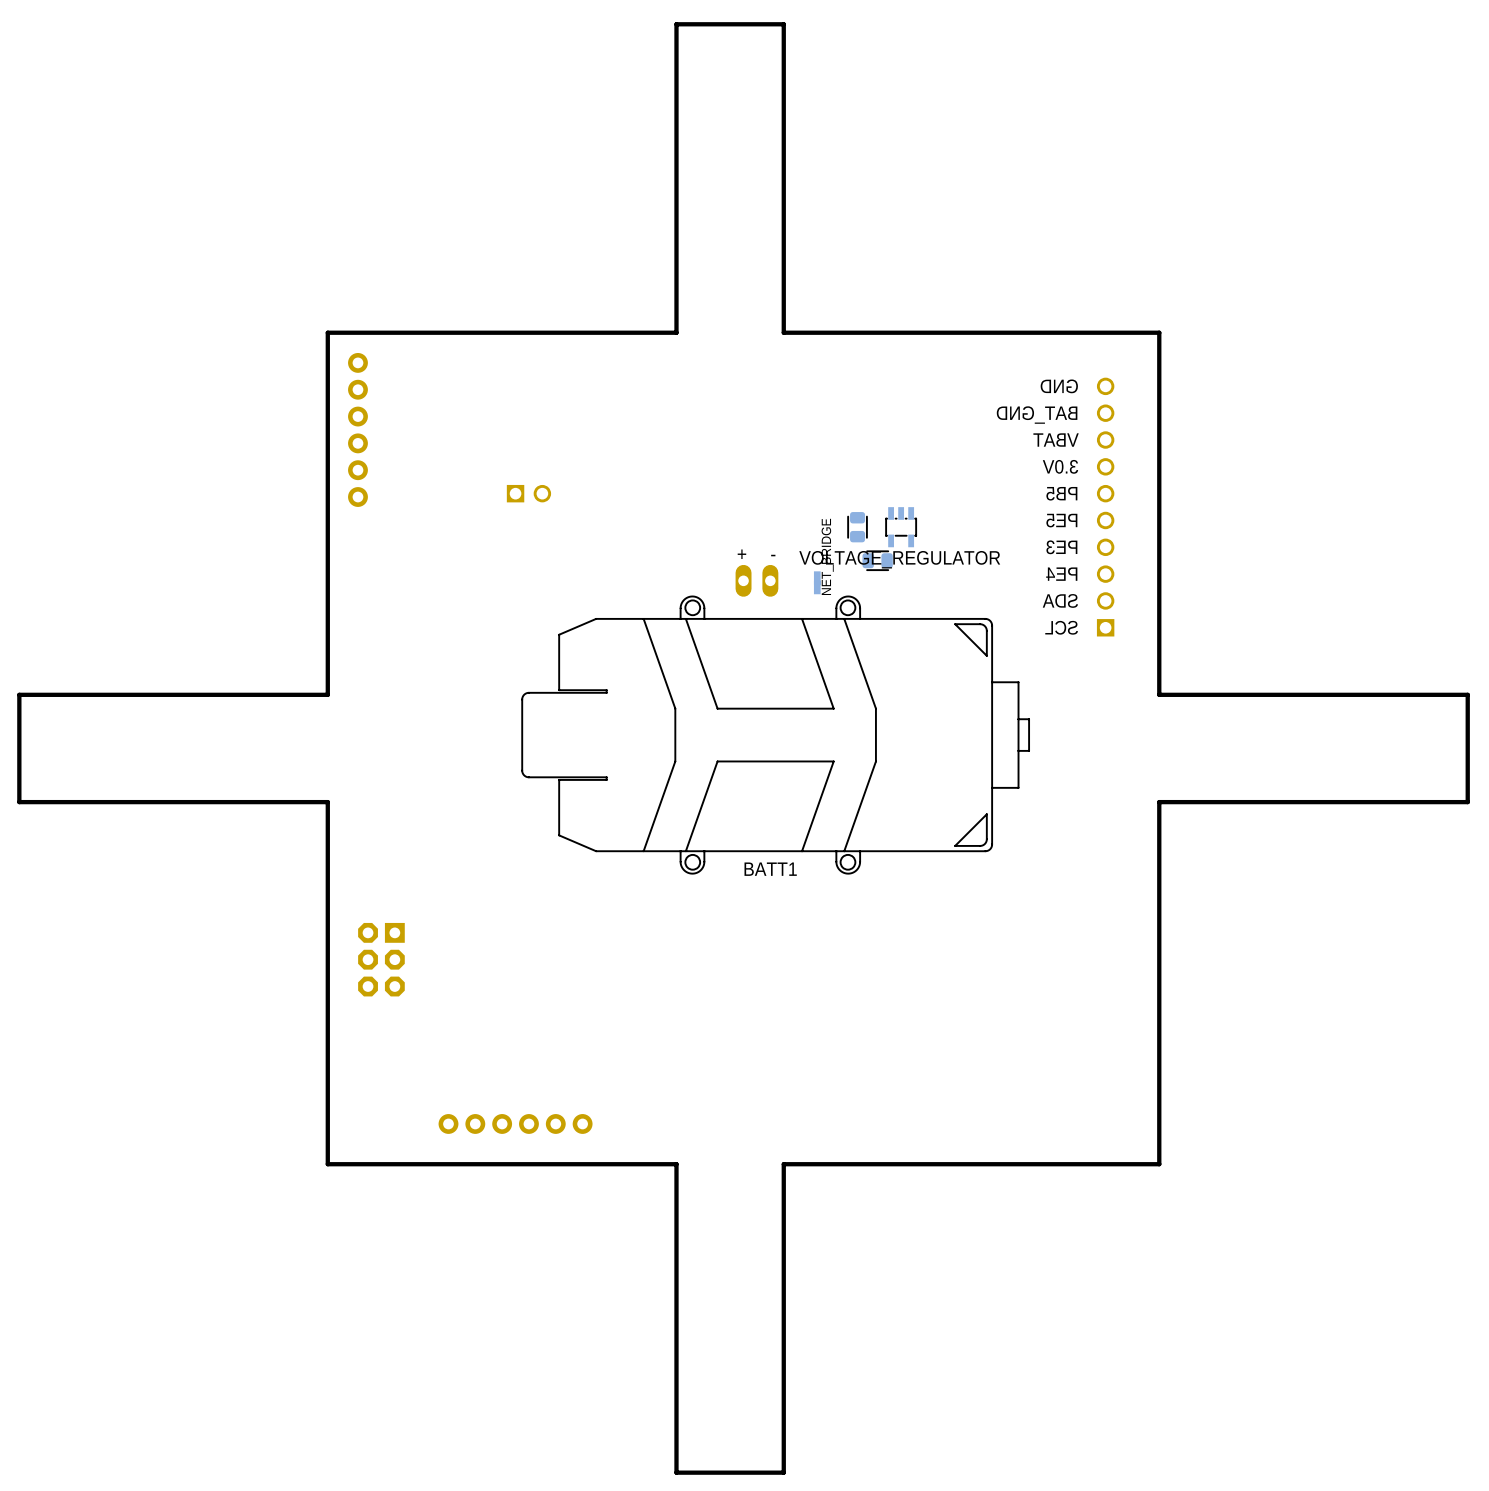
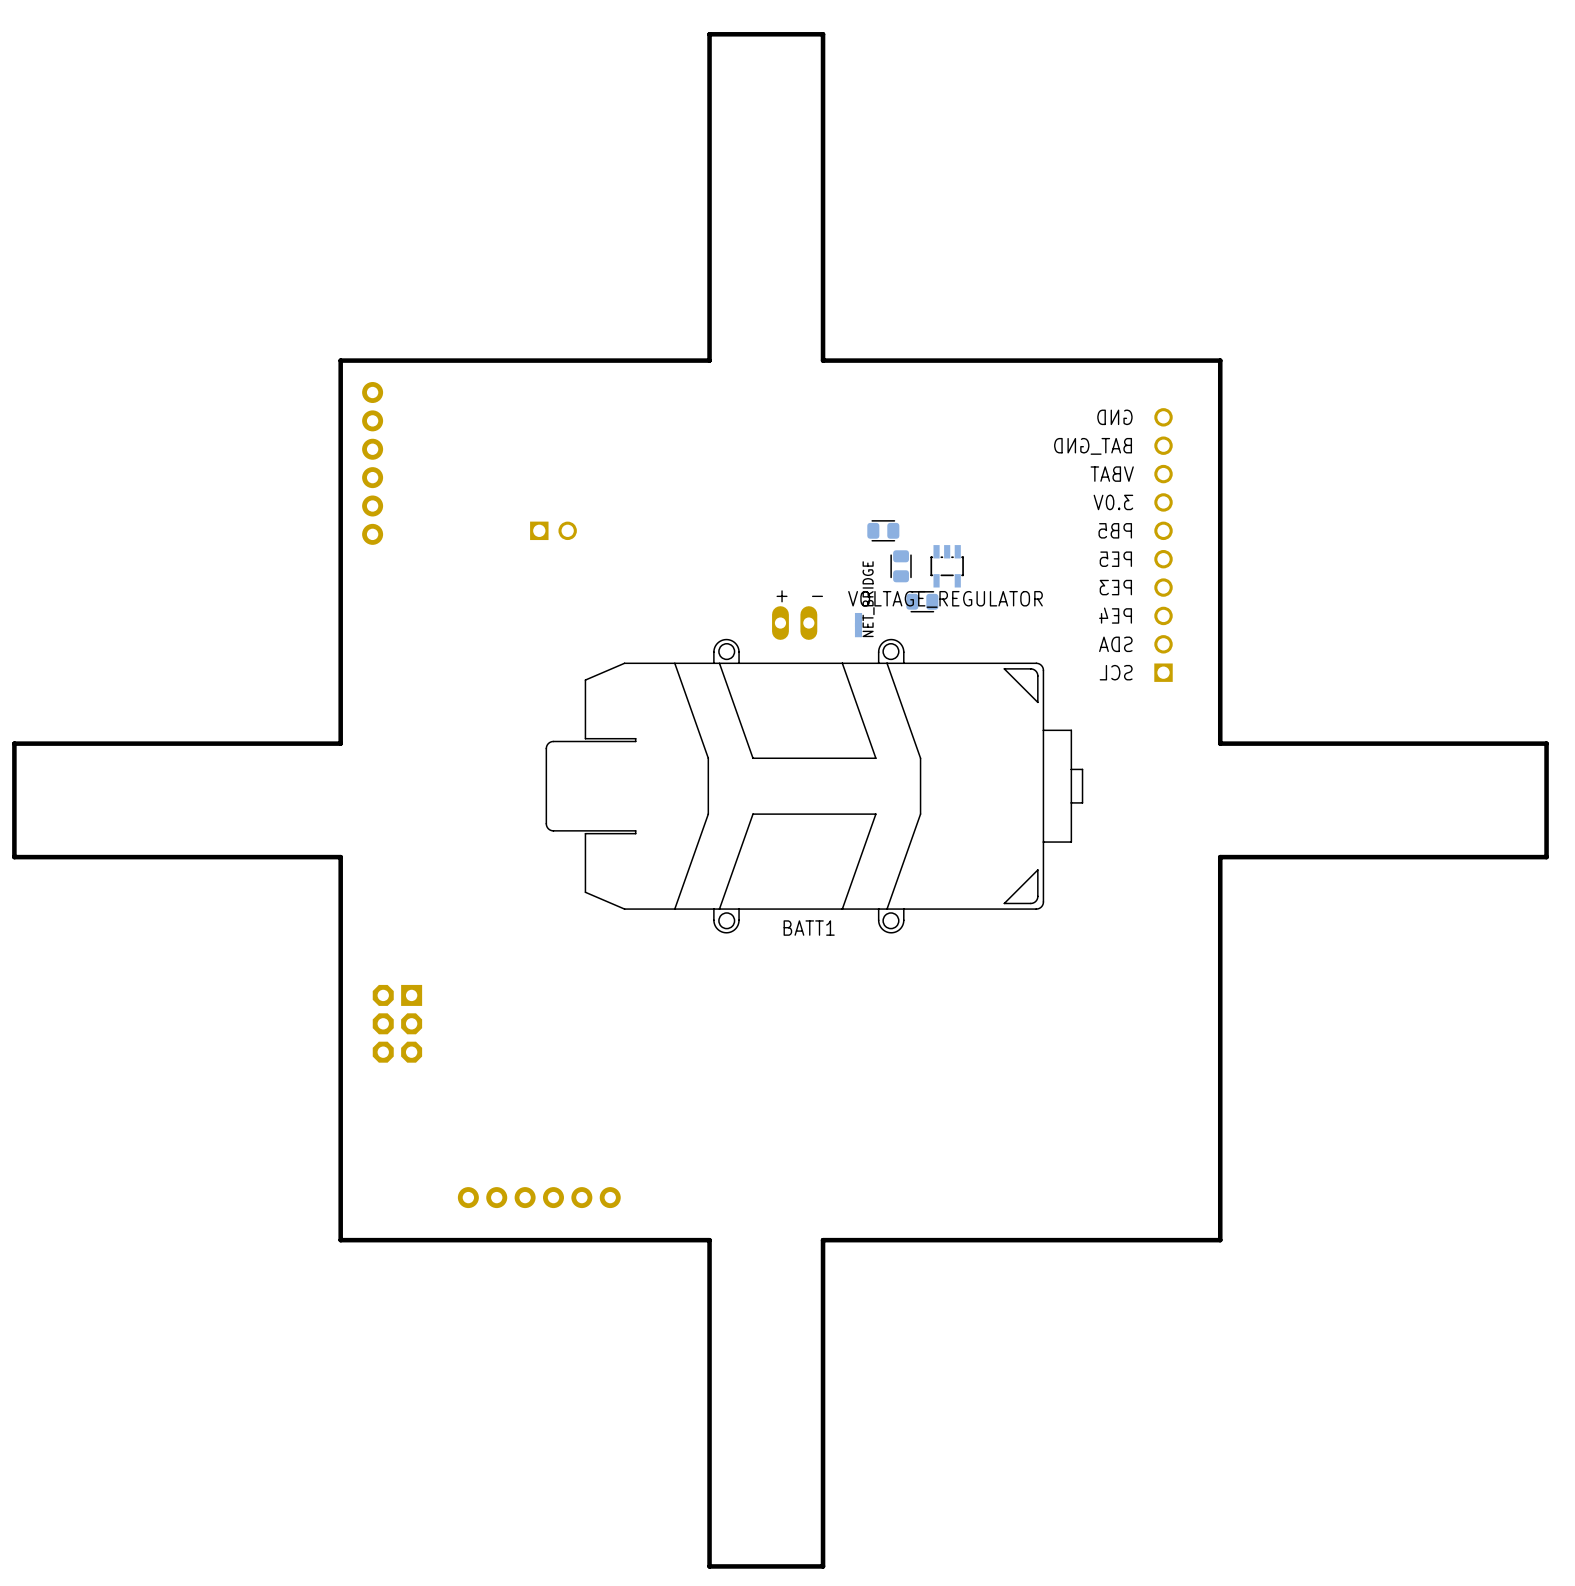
part: none -> (883, 530)

